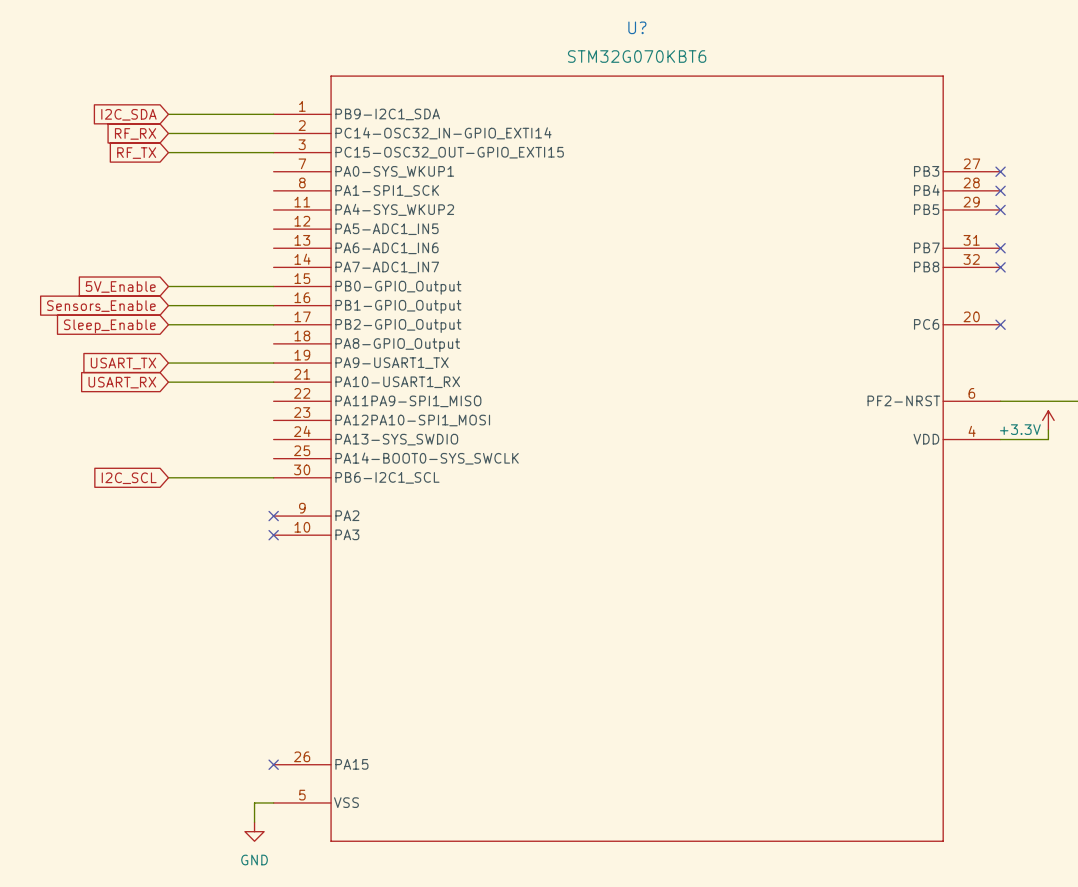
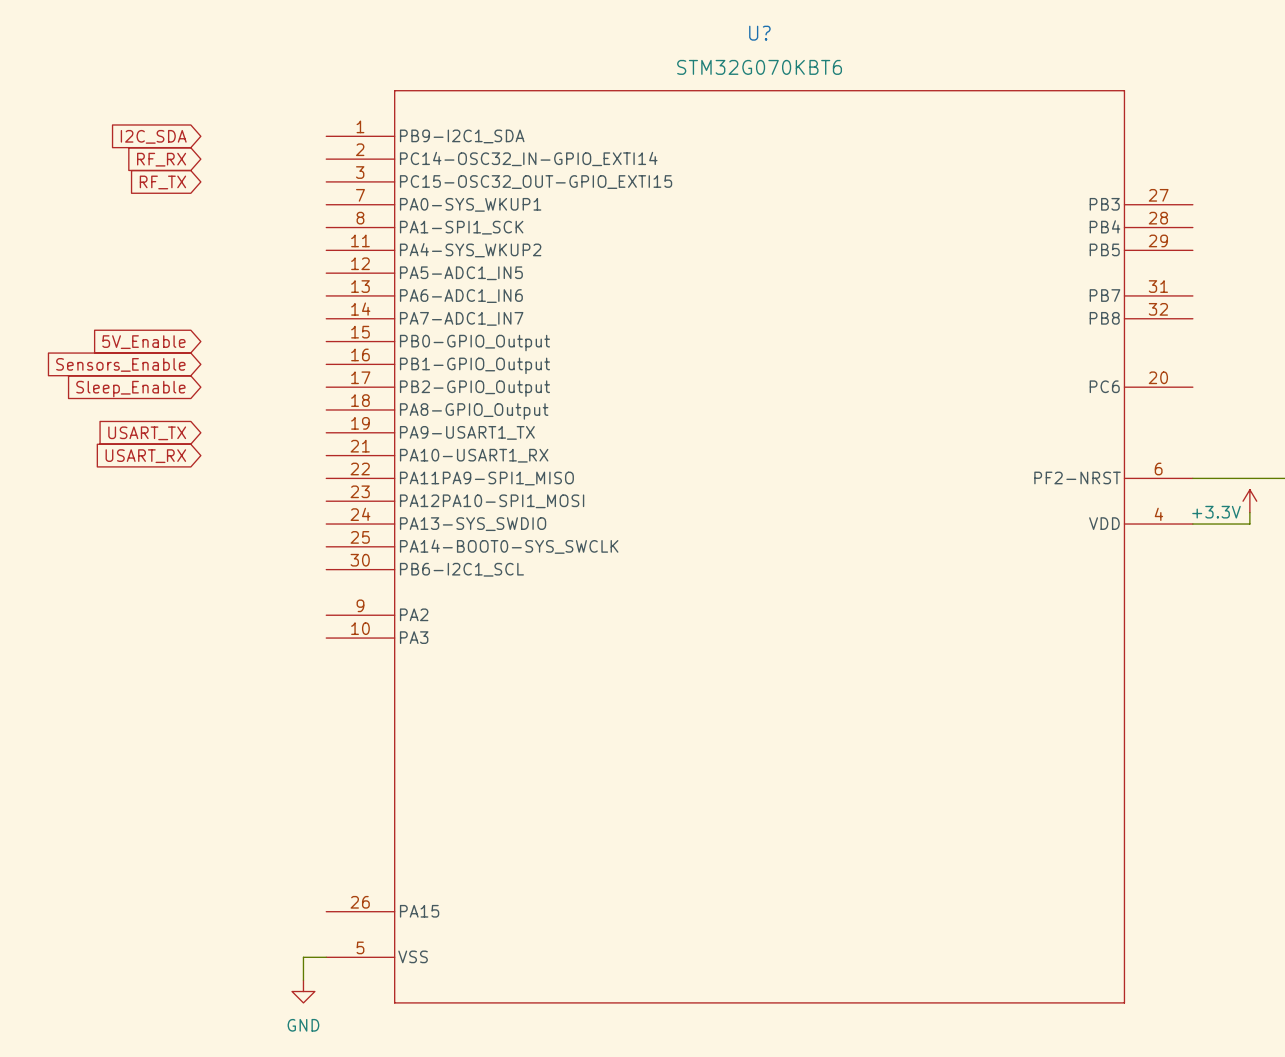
wire: (168, 114) (273, 114) -> none
wire: (168, 133) (273, 133) -> none
wire: (168, 152) (273, 152) -> none
no-connect mark: (1000, 171) -> none
no-connect mark: (1000, 190) -> none
no-connect mark: (1000, 209) -> none
no-connect mark: (1000, 248) -> none
no-connect mark: (1000, 267) -> none
wire: (168, 286) (273, 286) -> none
wire: (168, 305) (273, 305) -> none
wire: (168, 324) (273, 324) -> none
no-connect mark: (1000, 324) -> none
wire: (168, 363) (273, 363) -> none
wire: (168, 382) (273, 382) -> none
wire: (168, 477) (273, 477) -> none
global label: I2C_SCL (129, 478) -> none
no-connect mark: (273, 516) -> none
no-connect mark: (273, 535) -> none
no-connect mark: (273, 764) -> none

